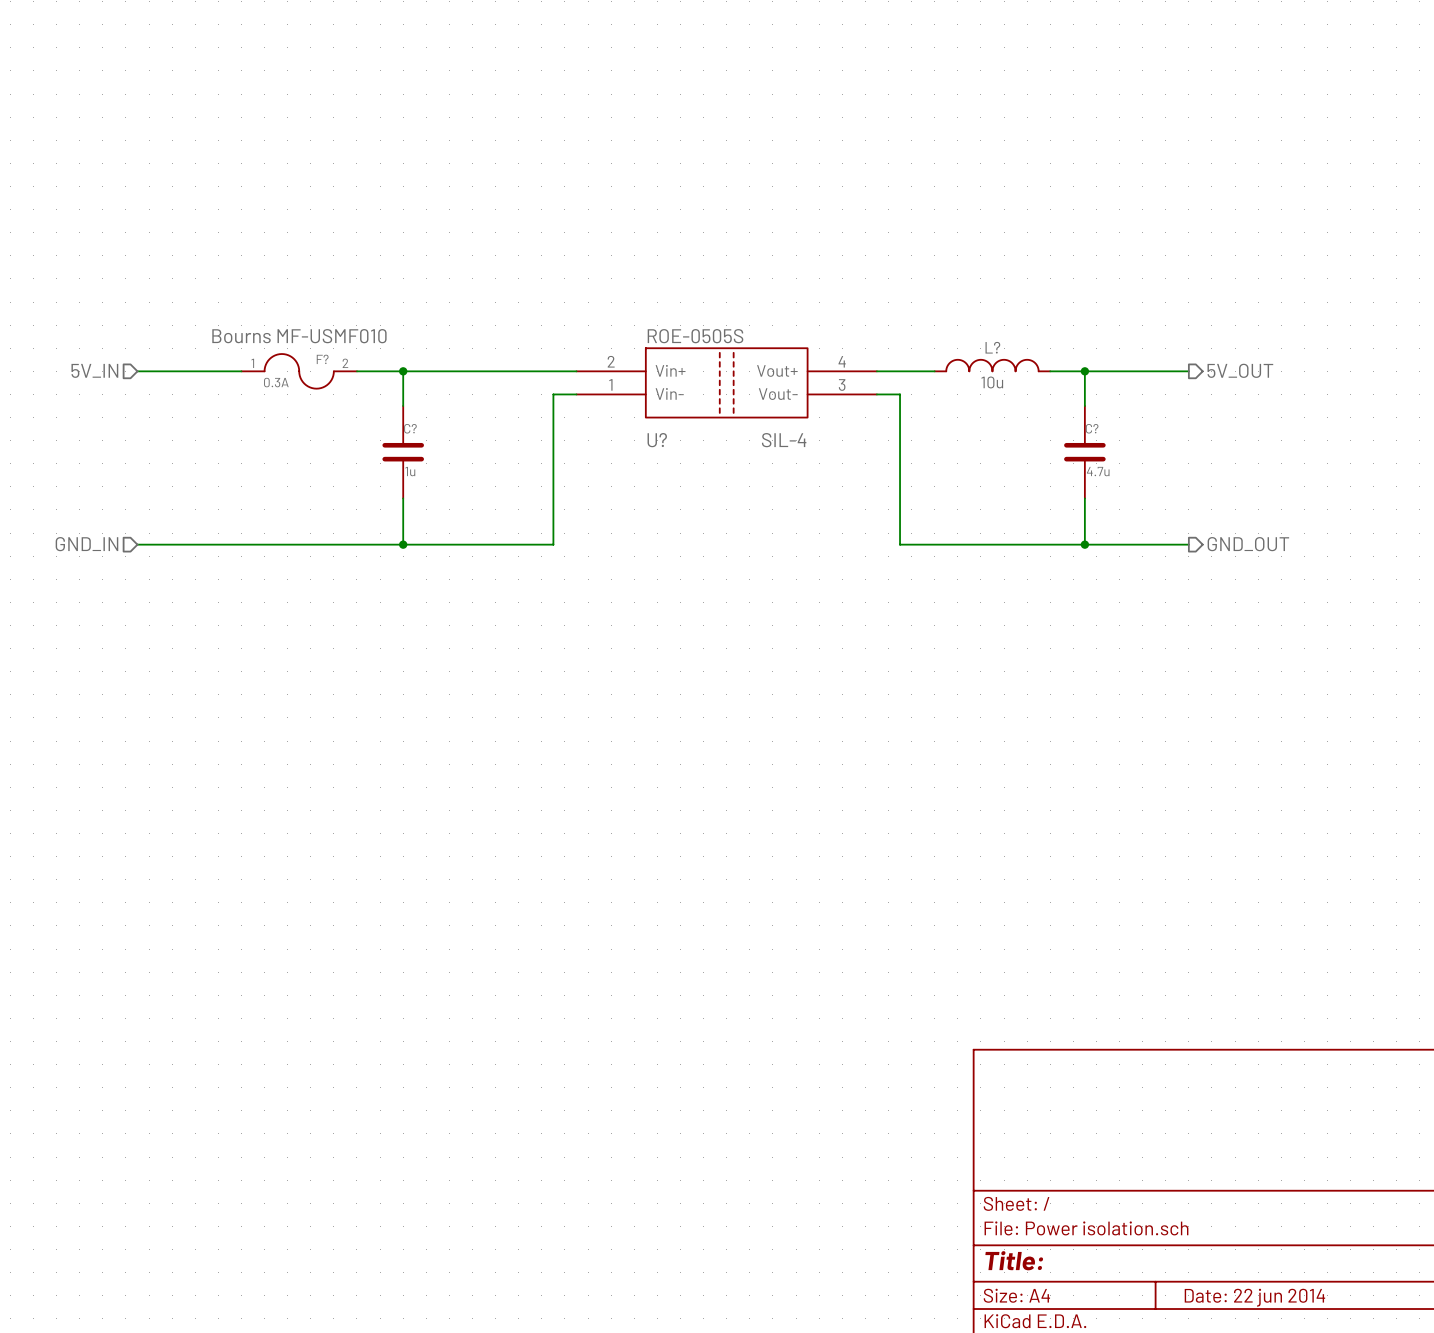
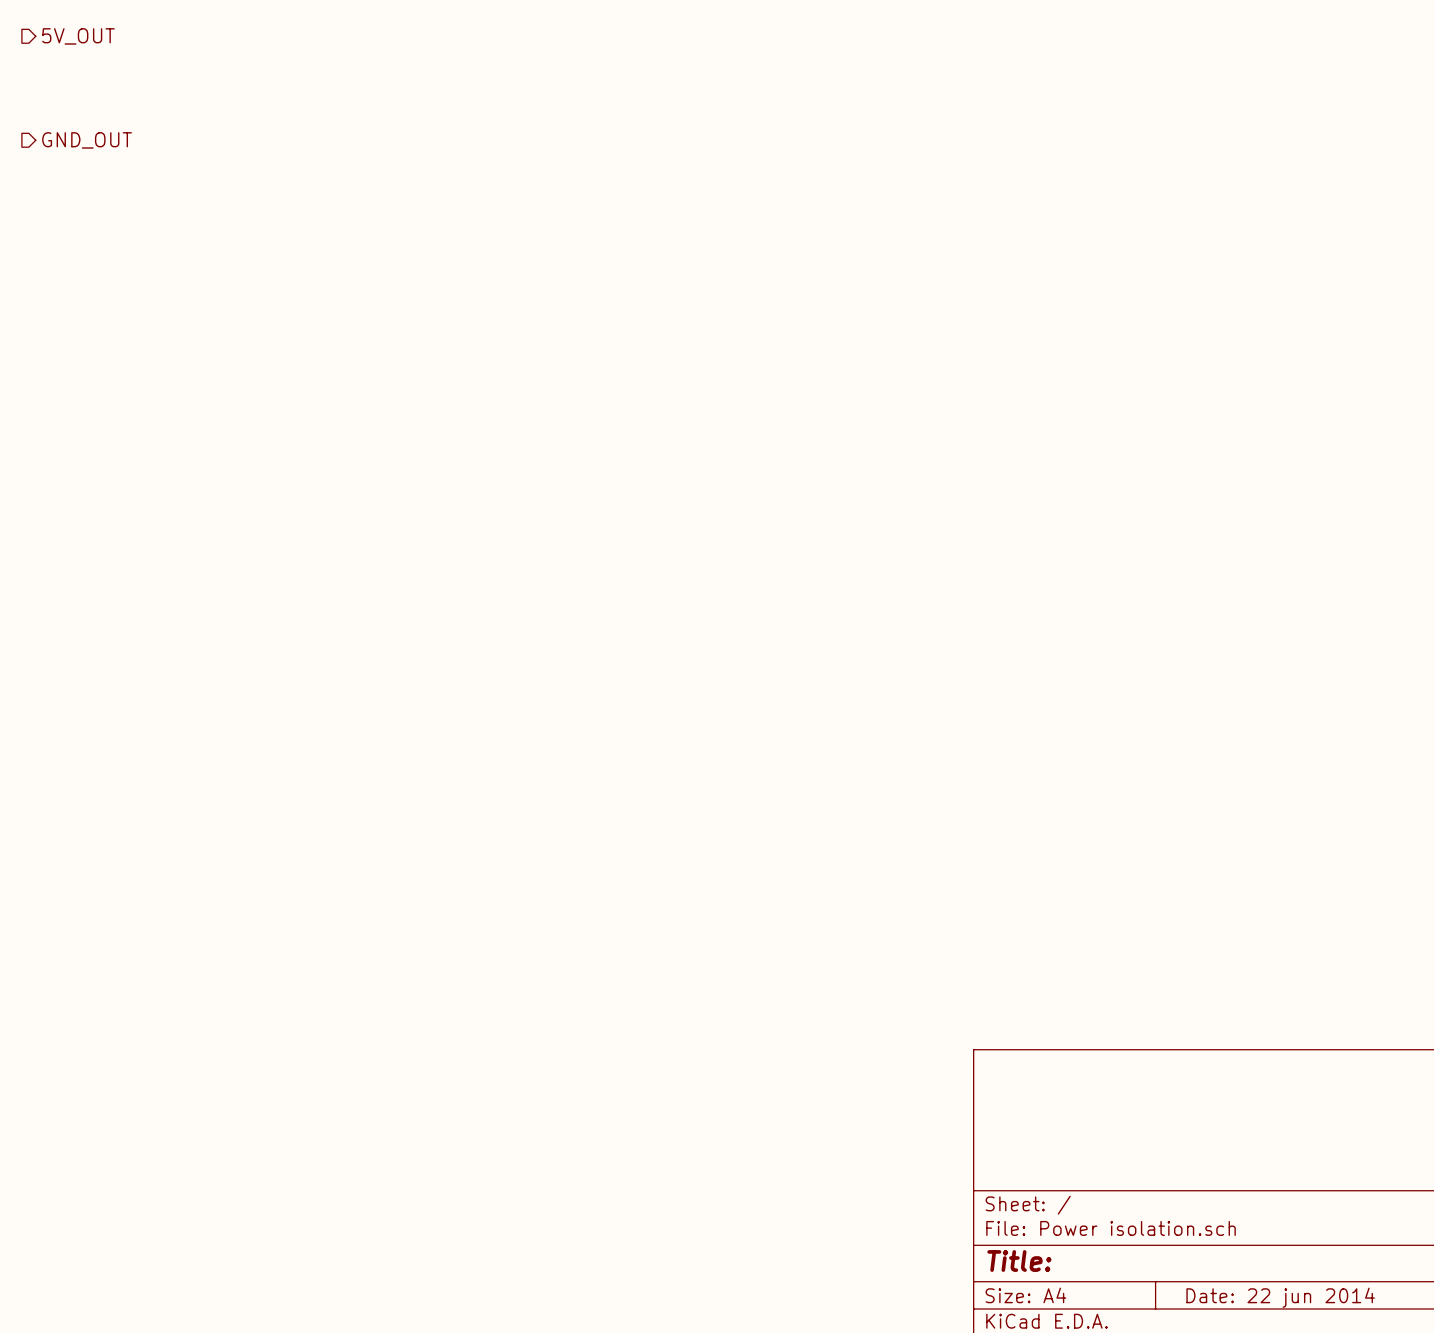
hierarchical label: none -> 5V_OUT (78, 36)
hierarchical label: none -> GND_OUT (87, 140)
L?: 10u (992, 365) -> none
hierarchical label: 5V_IN (94, 370) -> none
hierarchical label: 5V_OUT (1240, 370) -> none
wire: (137, 371) (241, 371) -> none
F?: 0.3A (299, 371) -> none
wire: (356, 371) (576, 371) -> none
wire: (403, 371) (403, 406) -> none
junction: (403, 371) -> none
wire: (876, 371) (934, 371) -> none
wire: (1050, 371) (1188, 371) -> none
wire: (1084, 371) (1084, 406) -> none
junction: (1084, 371) -> none
U?: ROE-0505S (726, 382) -> none
wire: (576, 394) (553, 394) (553, 544) (137, 544) -> none
wire: (876, 394) (900, 394) (900, 544) (1188, 544) -> none
C?: 1u (403, 452) -> none
C?: 4.7u (1084, 452) -> none
wire: (403, 498) (403, 544) -> none
wire: (1084, 498) (1084, 544) -> none
hierarchical label: GND_IN (86, 544) -> none
junction: (403, 544) -> none
junction: (1084, 544) -> none
hierarchical label: GND_OUT (1248, 544) -> none

